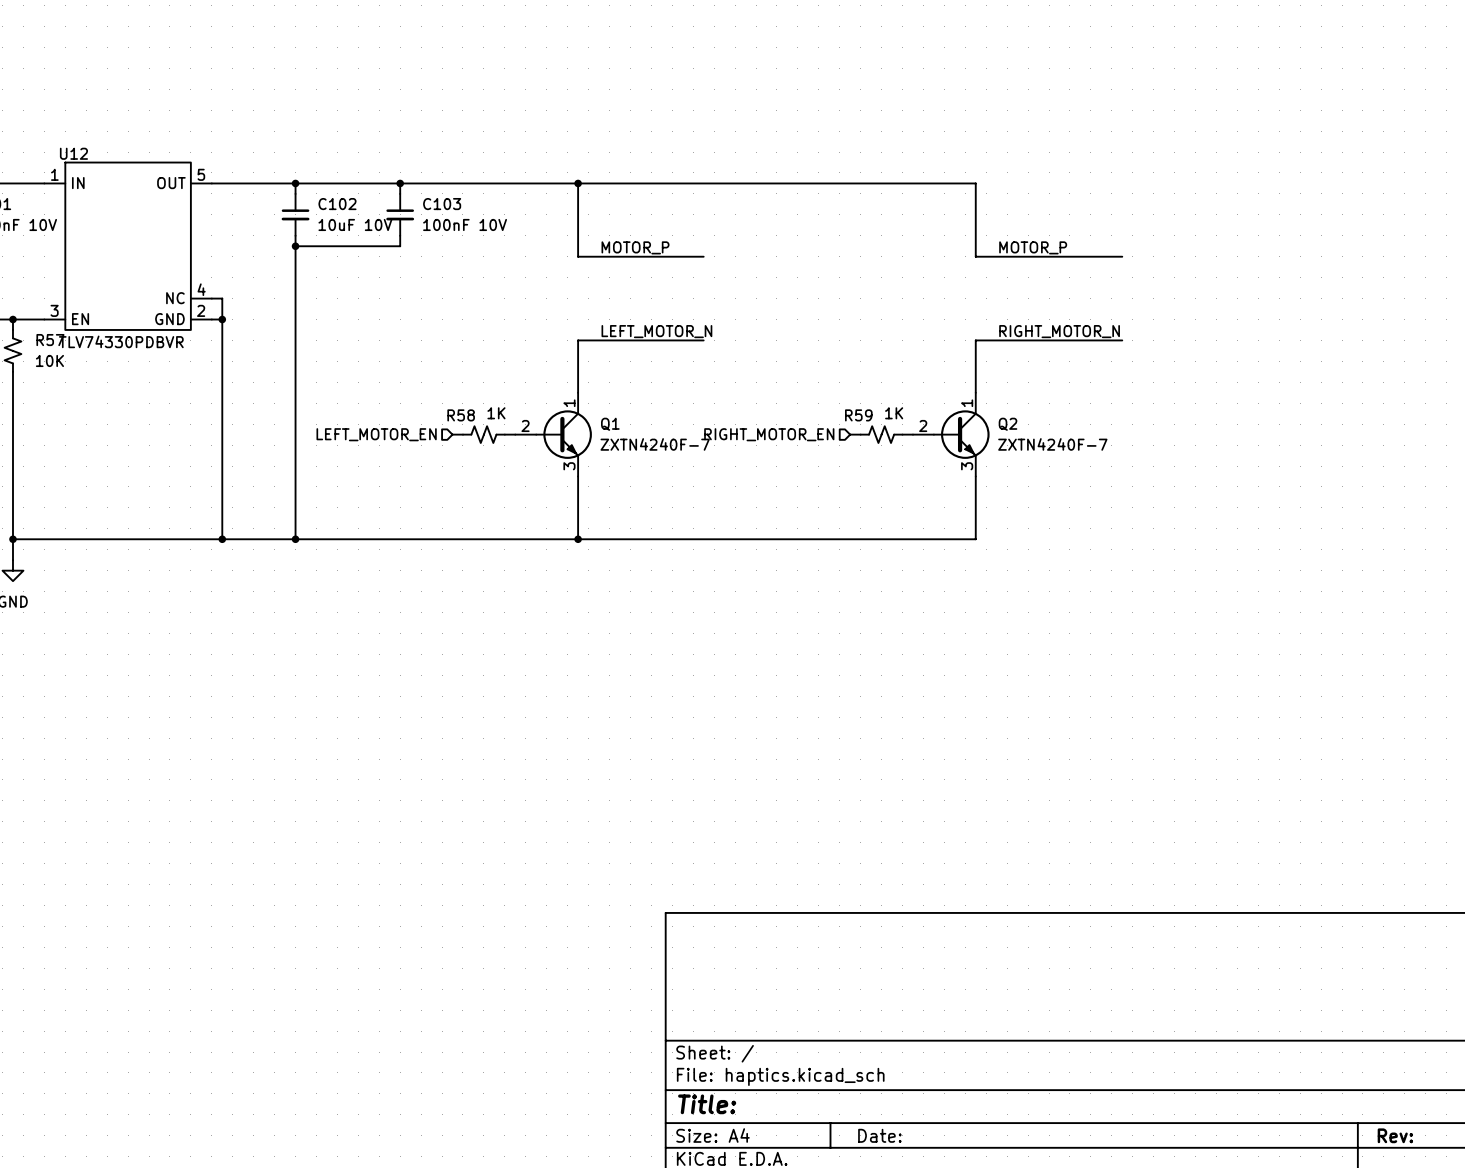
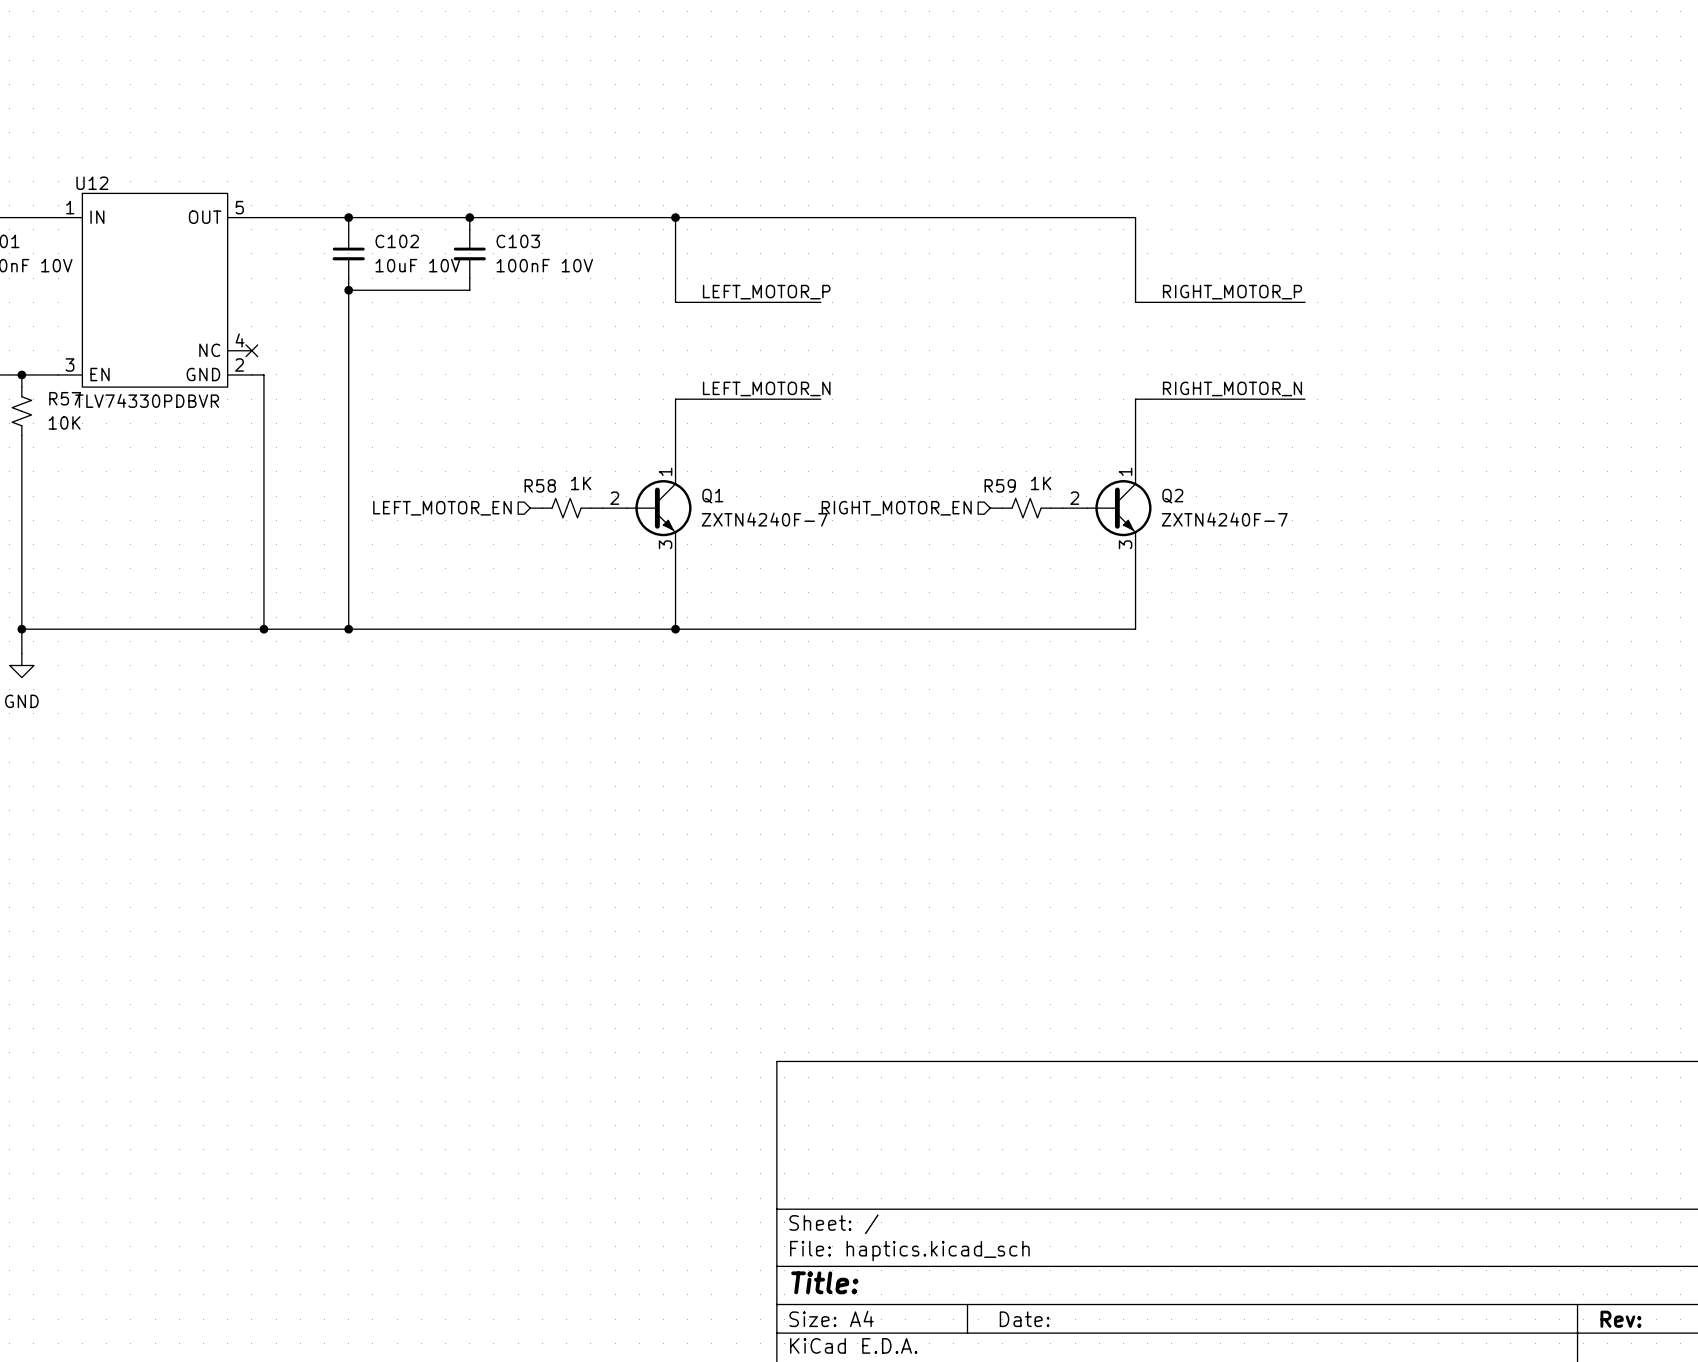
label: MOTOR_P (635, 247) -> LEFT_MOTOR_P (766, 292)
label: MOTOR_P (1033, 247) -> RIGHT_MOTOR_P (1232, 292)
wire: (211, 298) (222, 298) (222, 319) -> none
no-connect mark: none -> (251, 350)
junction: (222, 319) -> none

